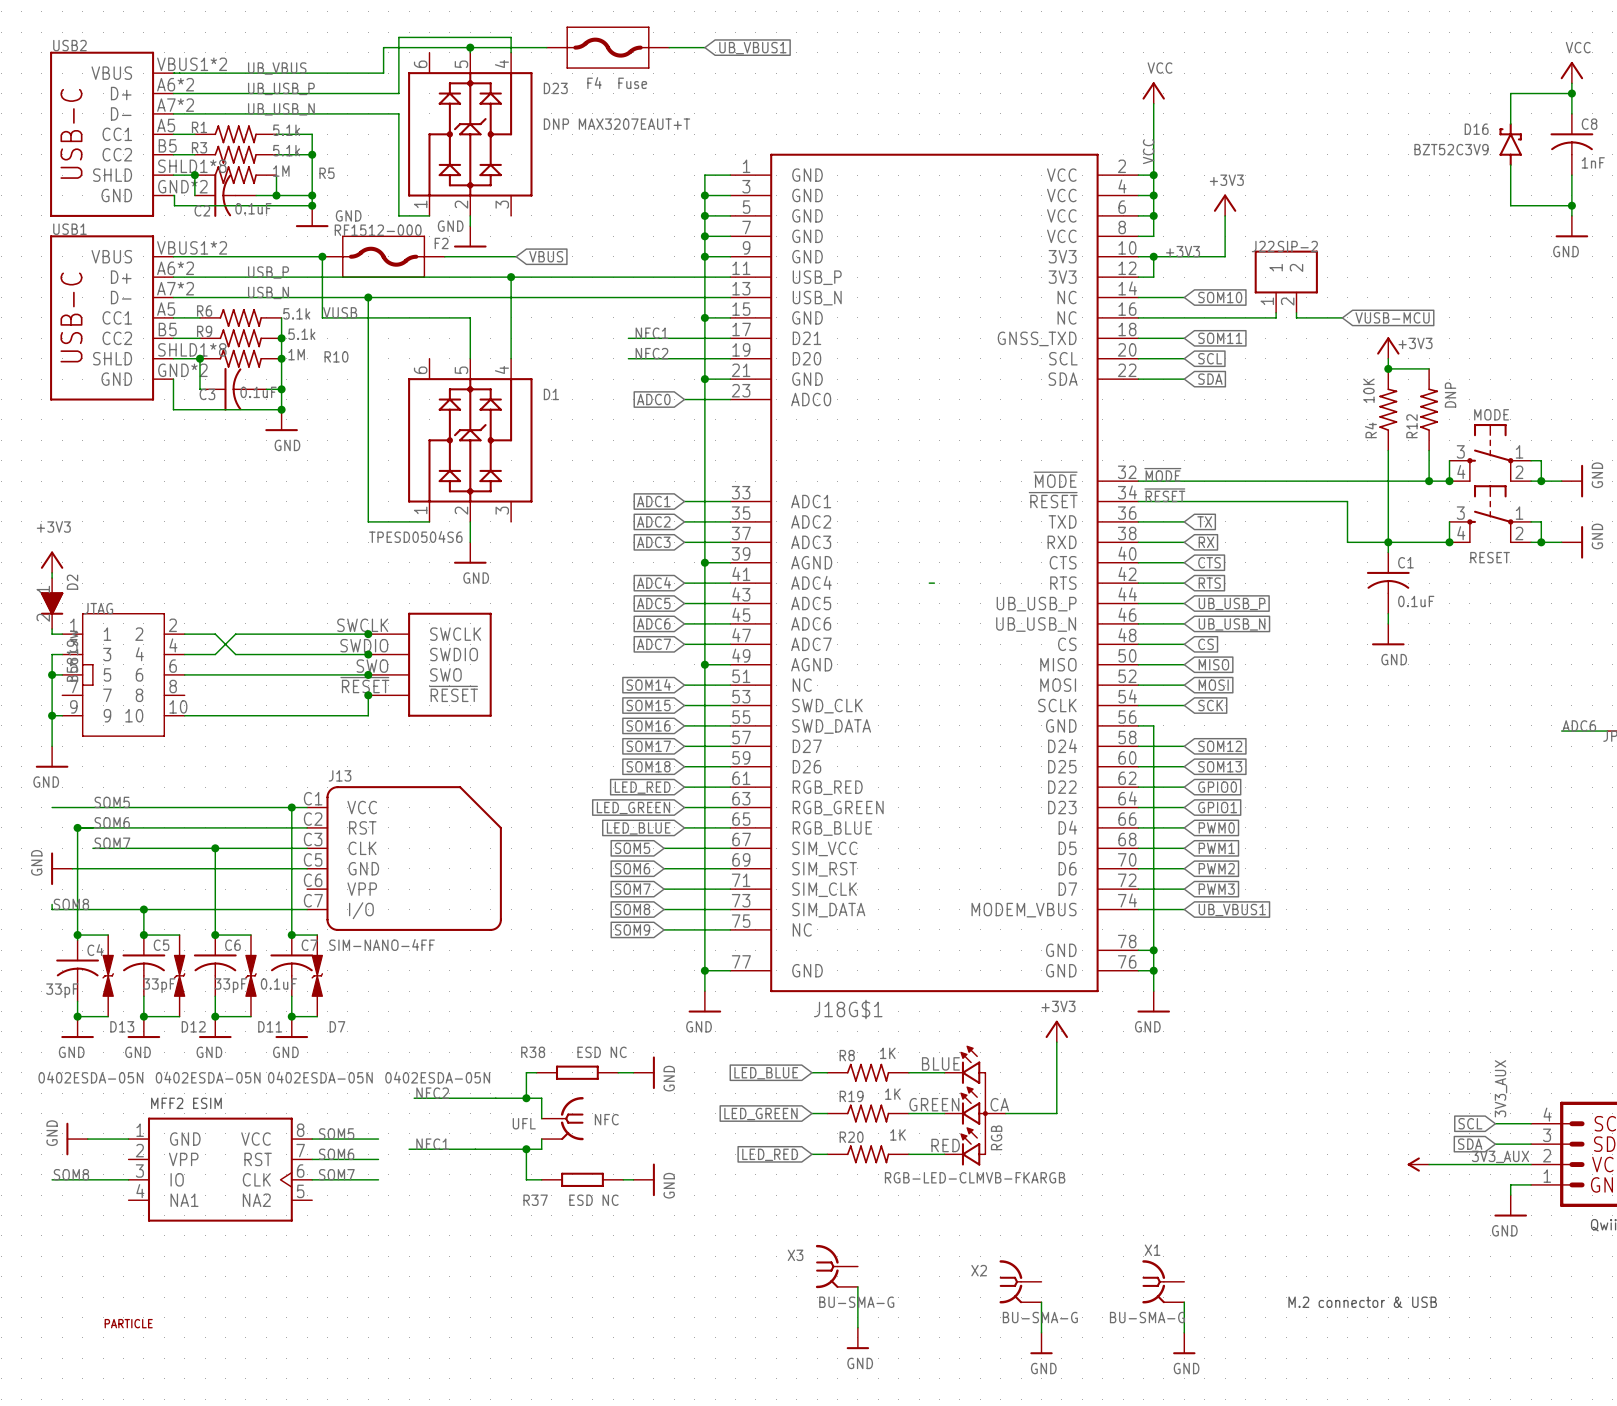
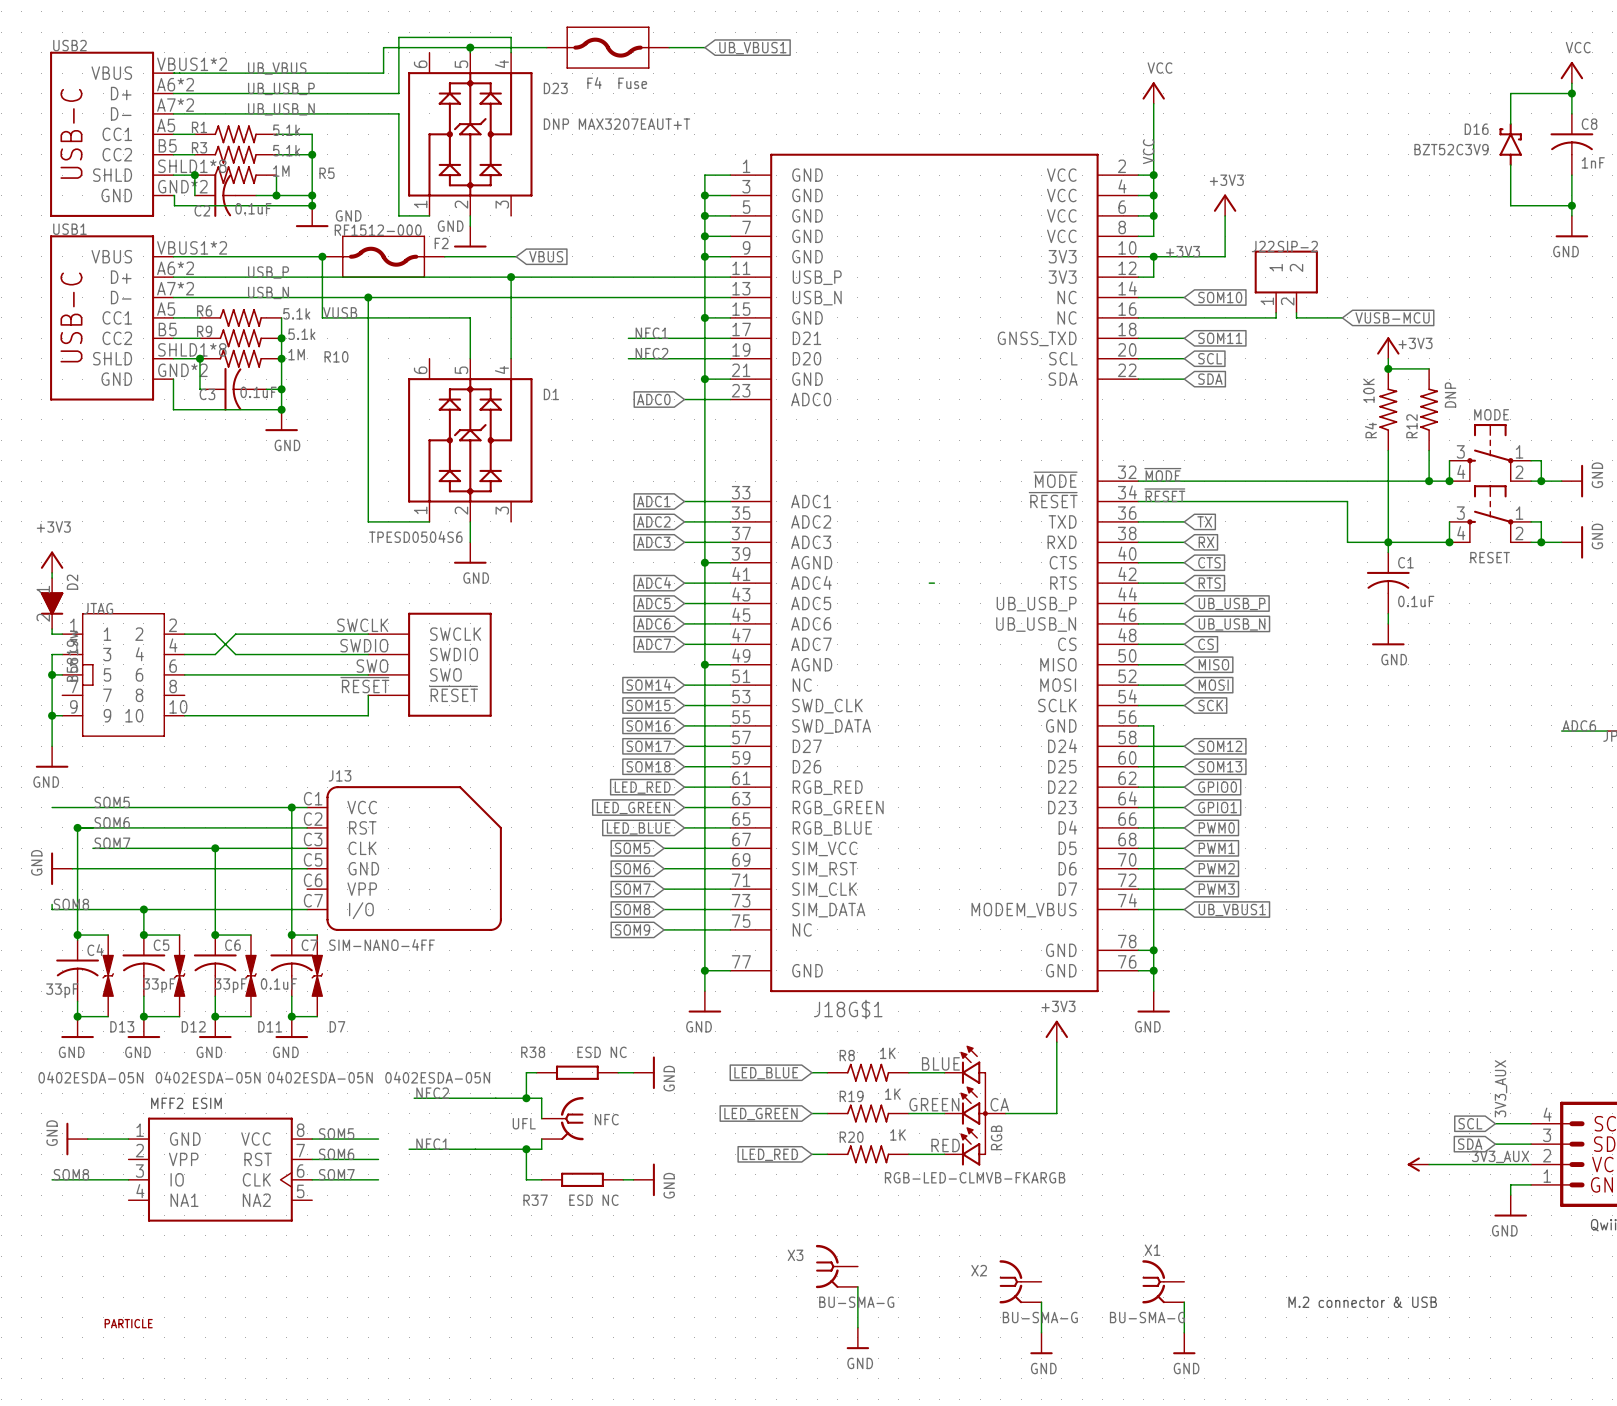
junction: (368, 634) -> none
junction: (368, 654) -> none
junction: (368, 674) -> none
junction: (368, 695) -> none

